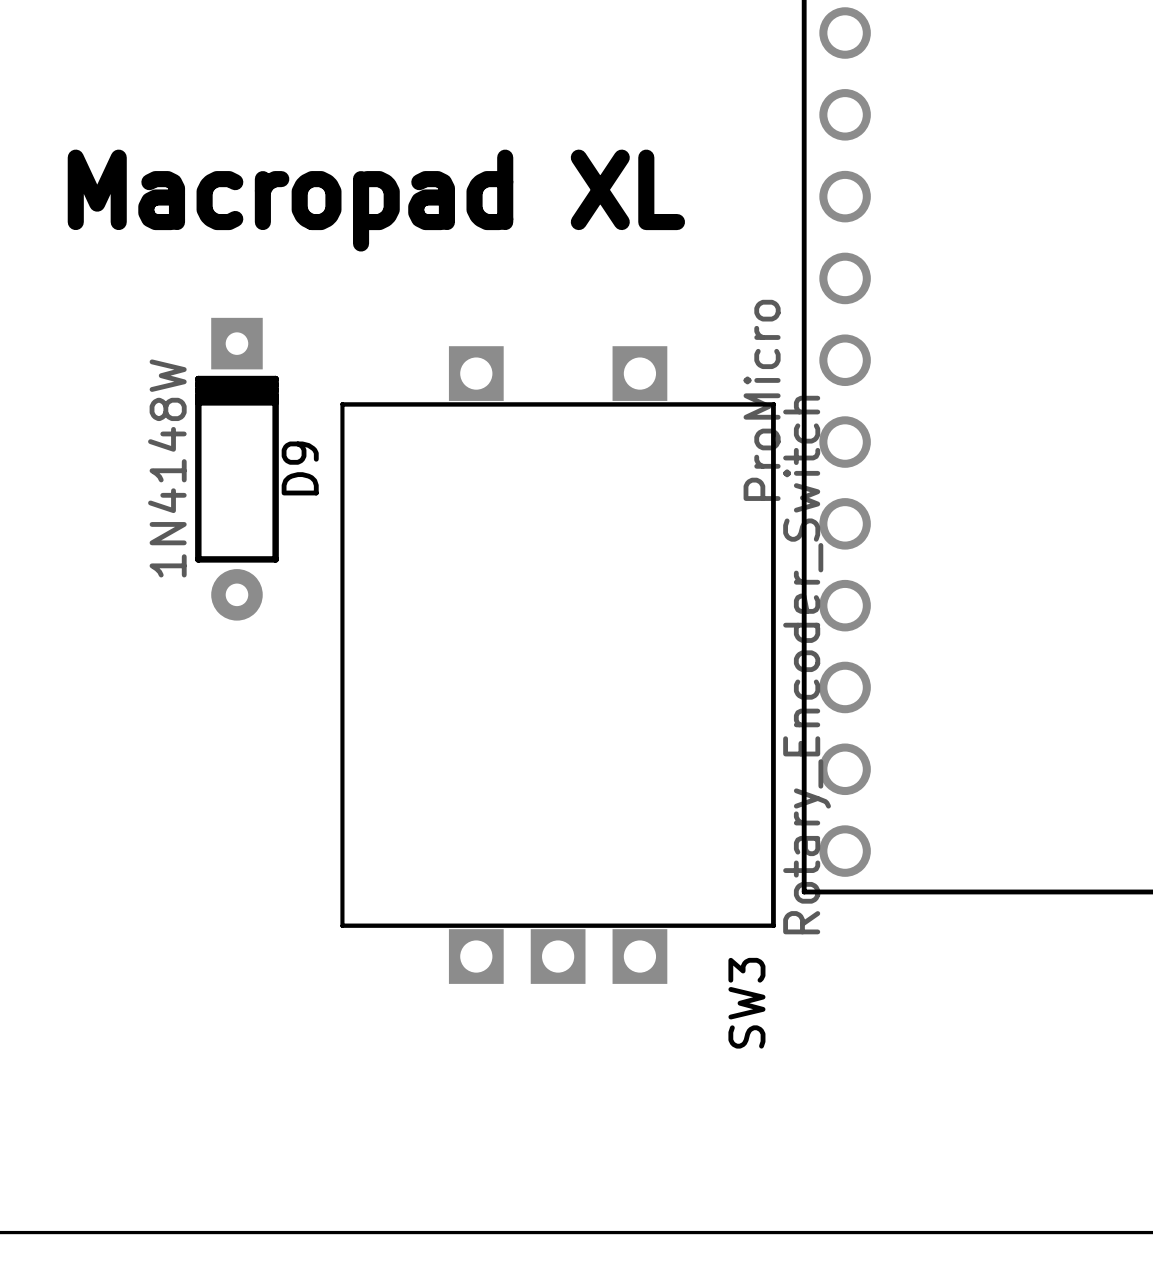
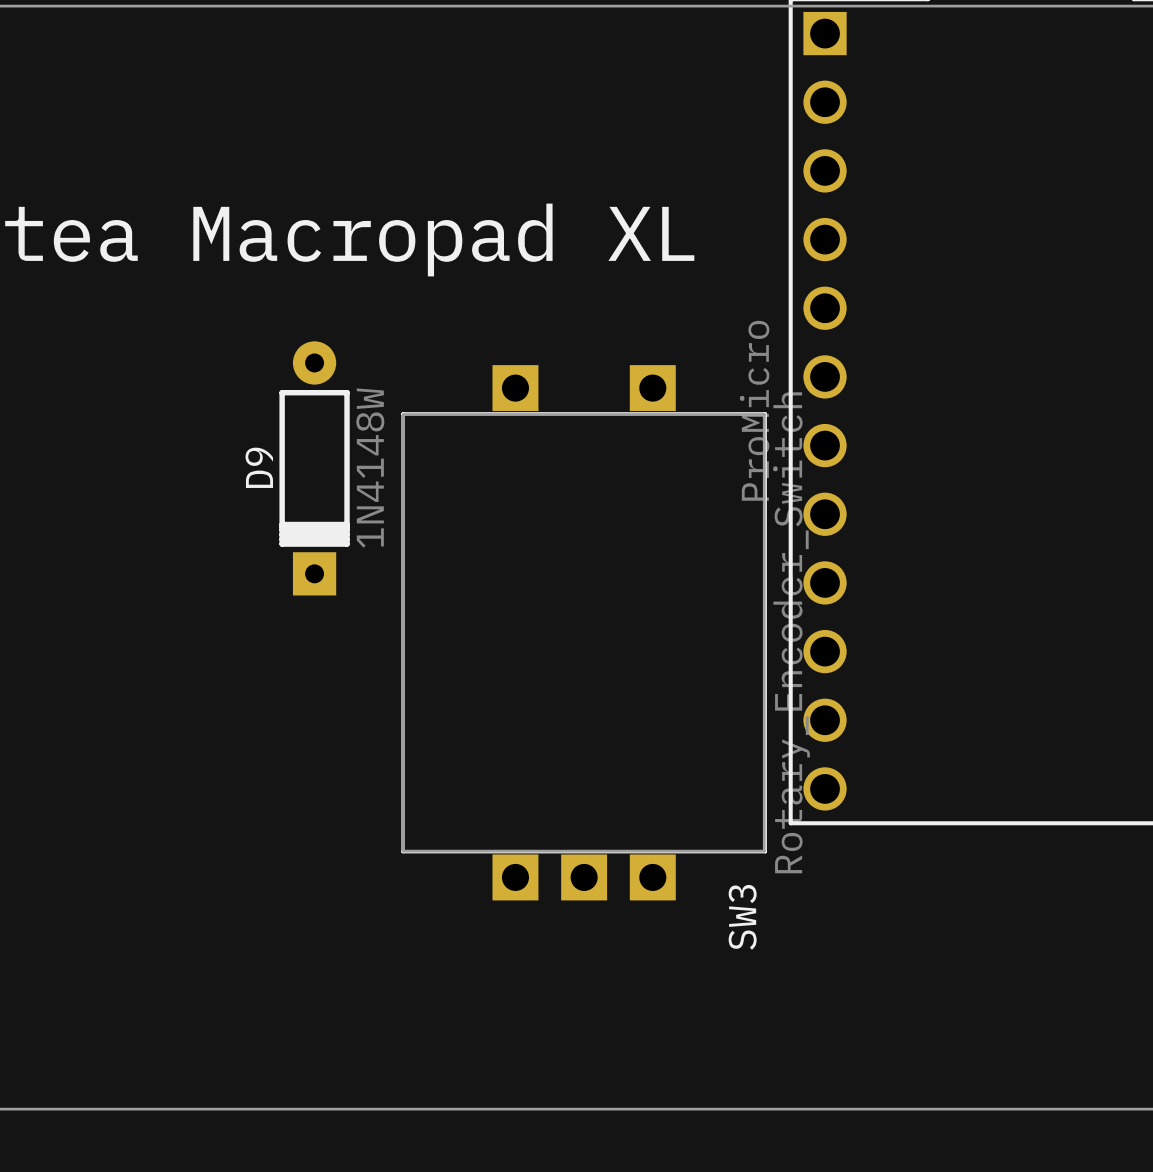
D9 rotation: 0° (236, 469) -> 180° (314, 468)

